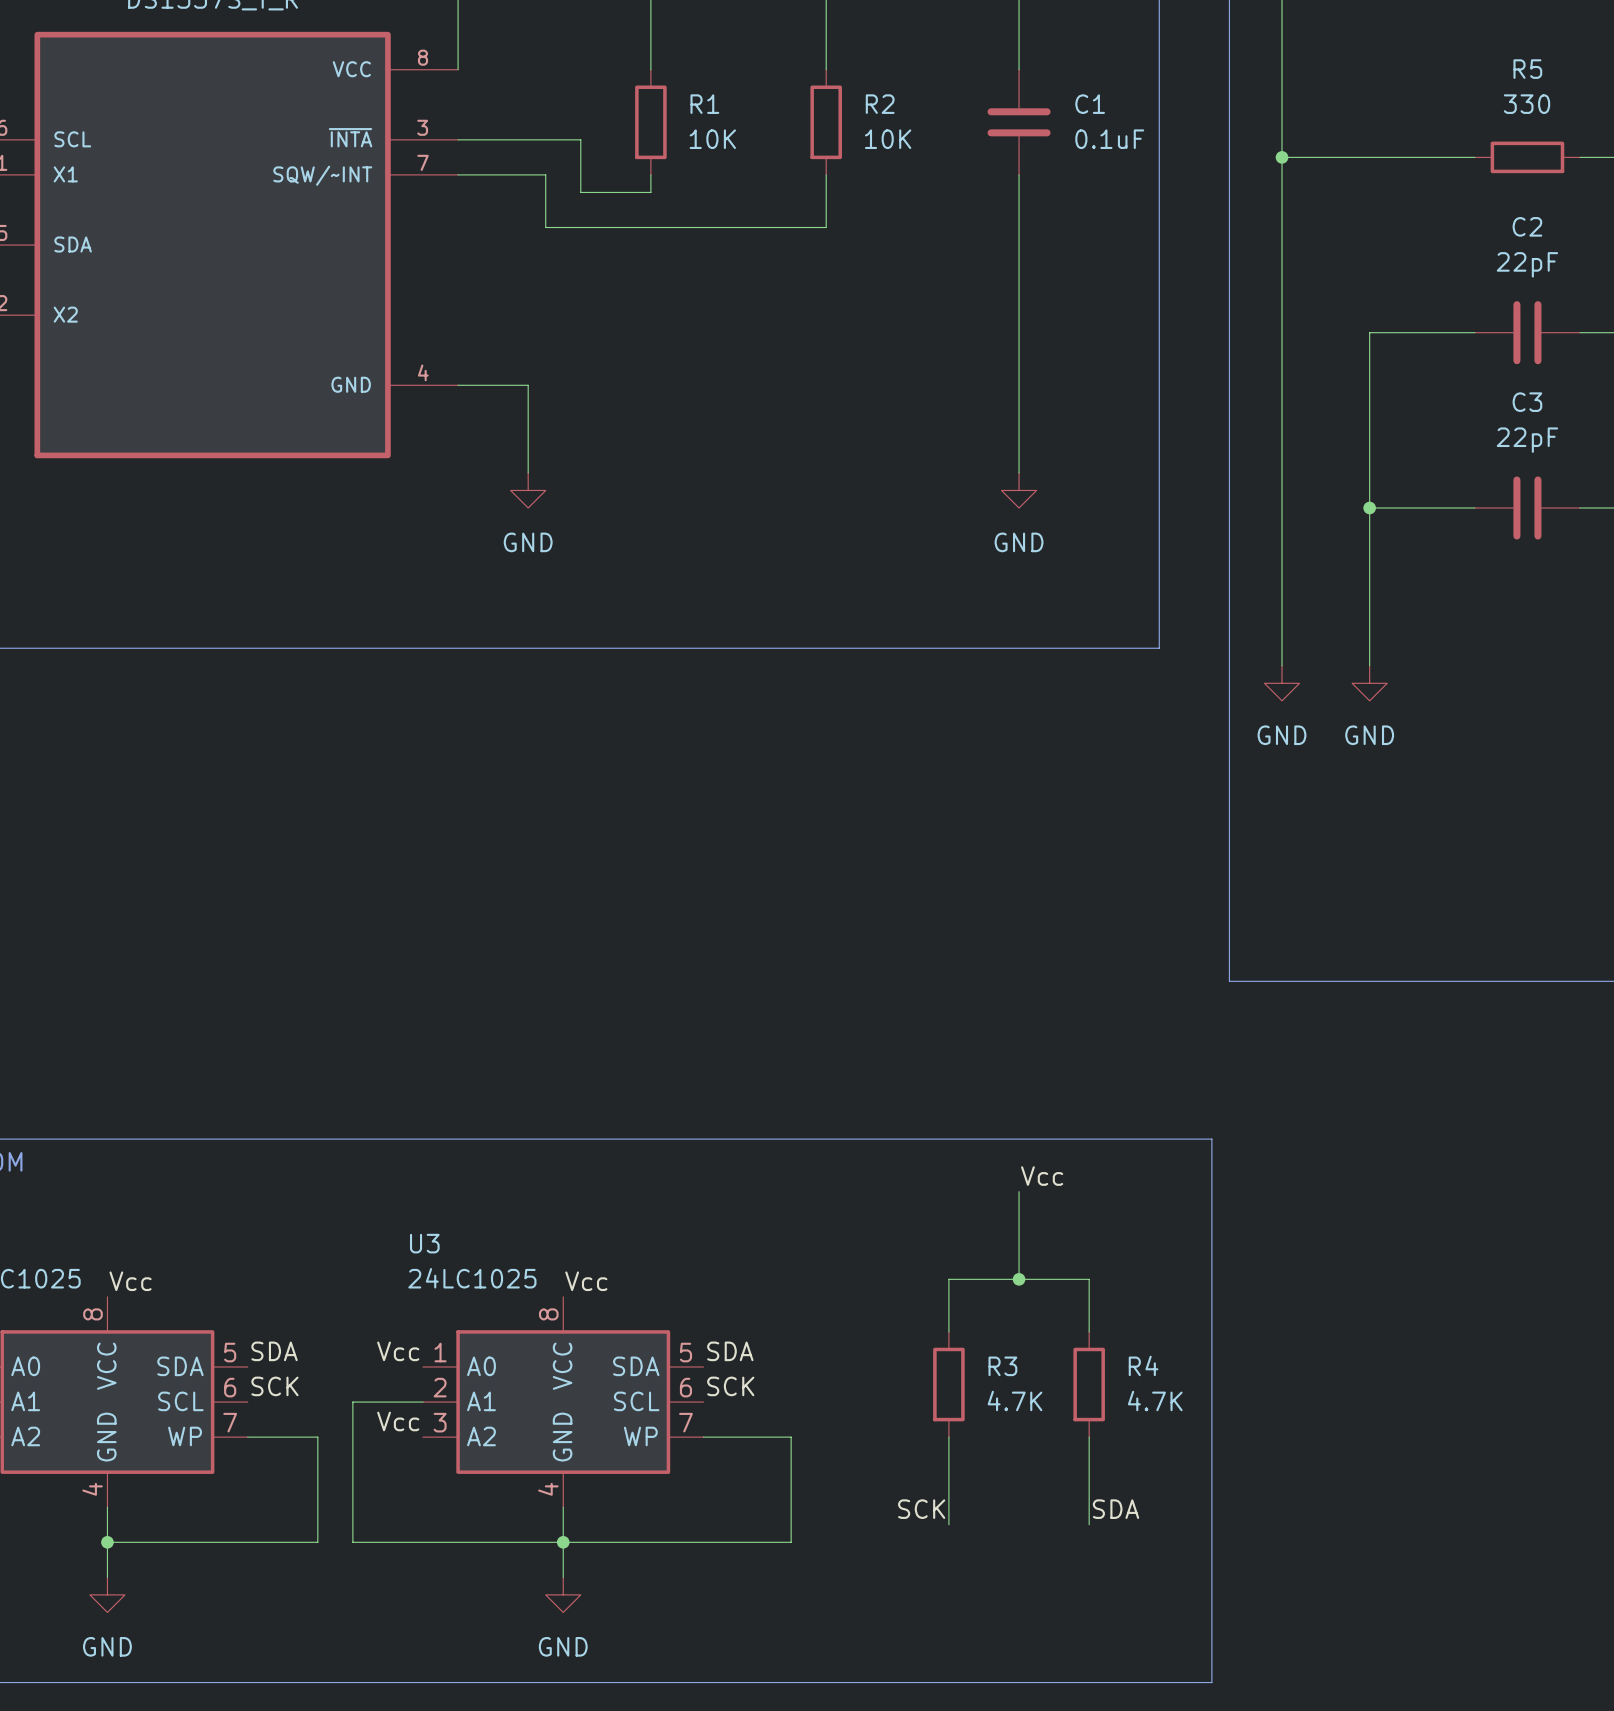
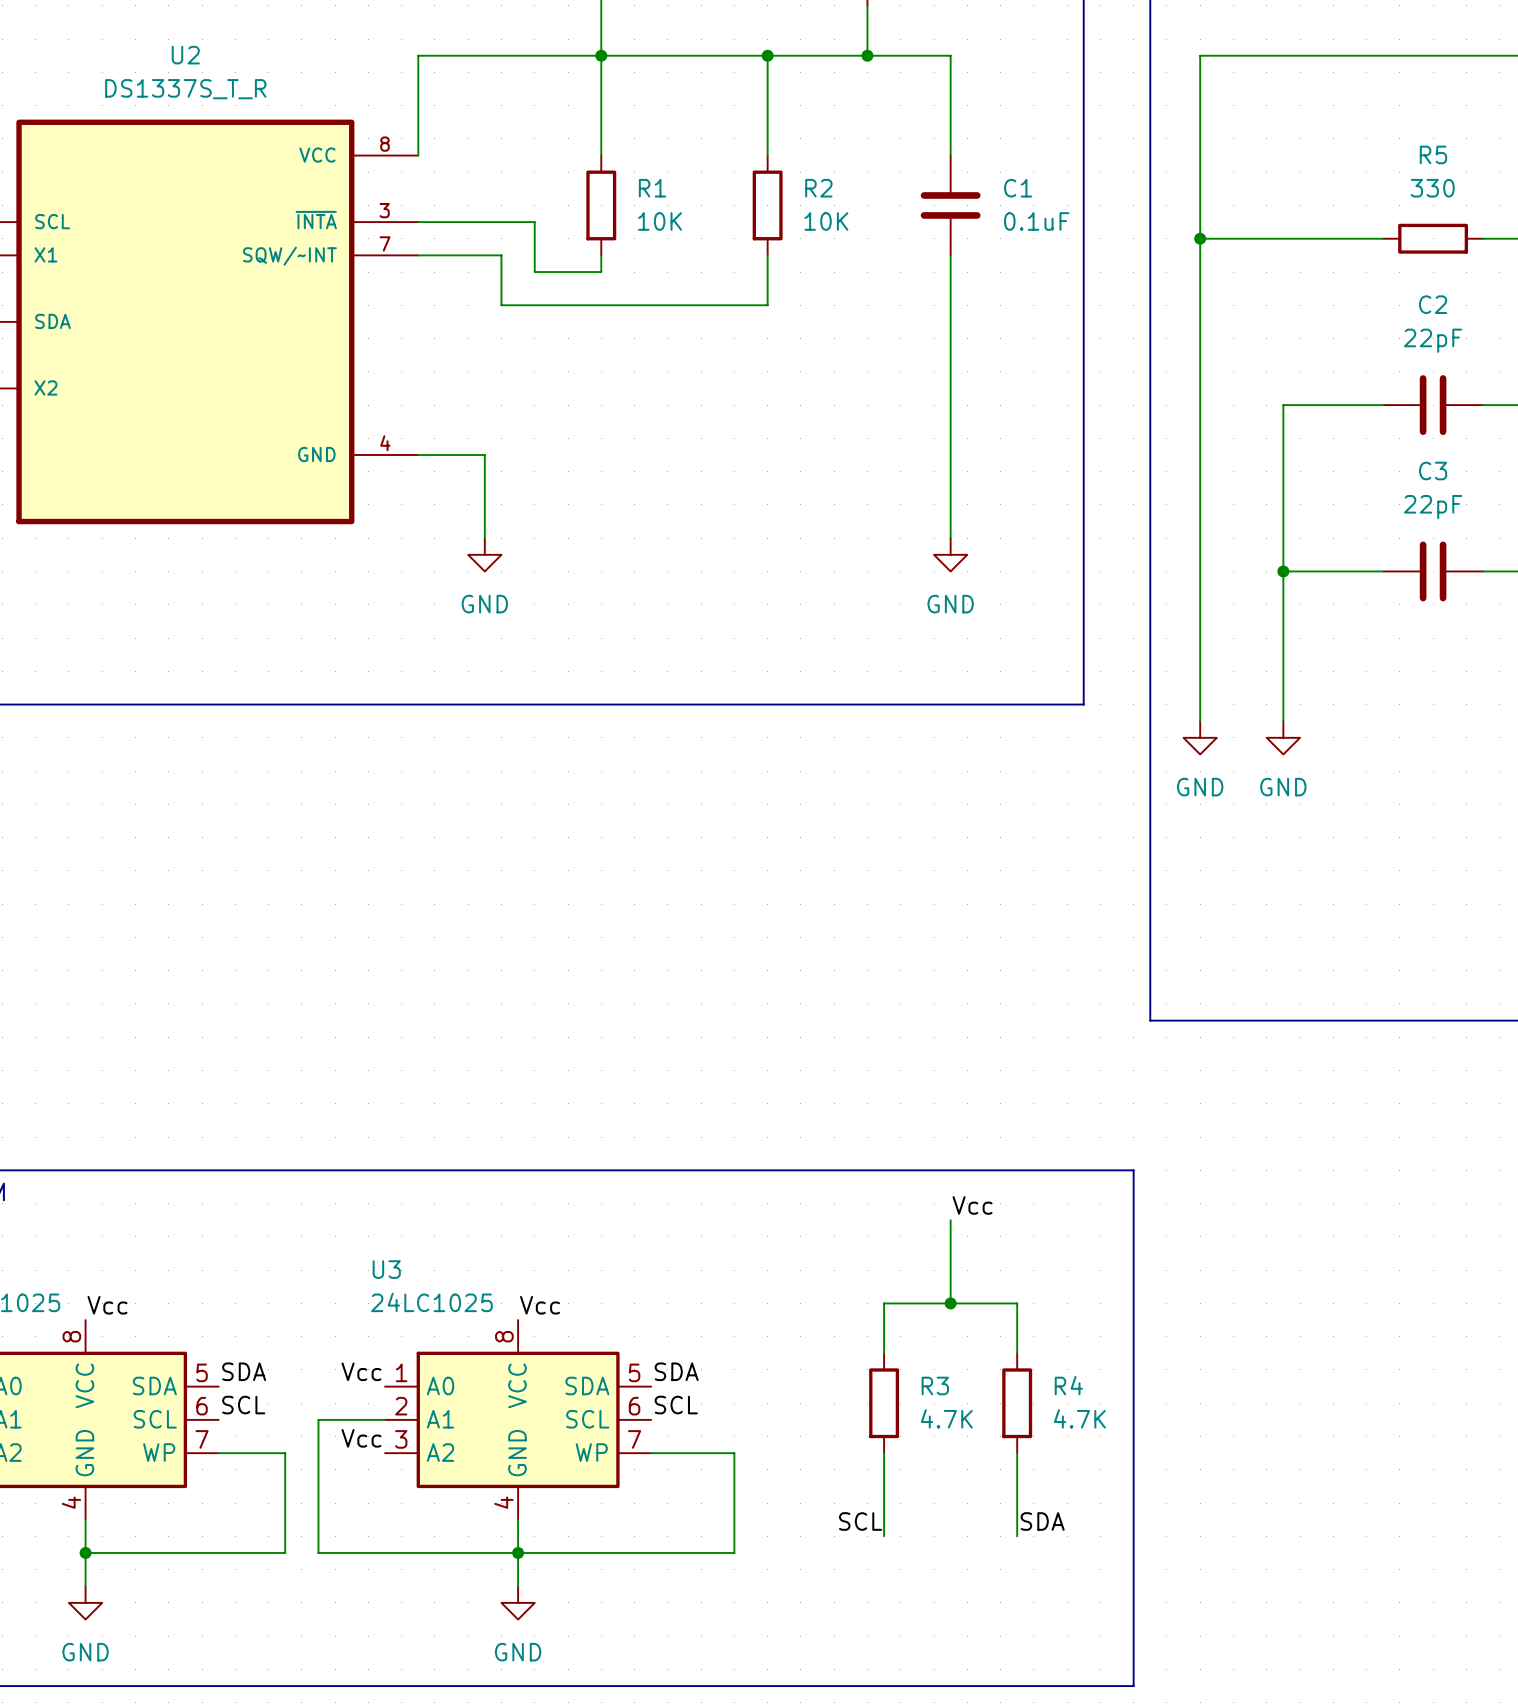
label: SCK (274, 1386) -> SCL (243, 1405)
label: SCK (730, 1386) -> SCL (676, 1405)
label: SCK (921, 1509) -> SCL (860, 1521)

